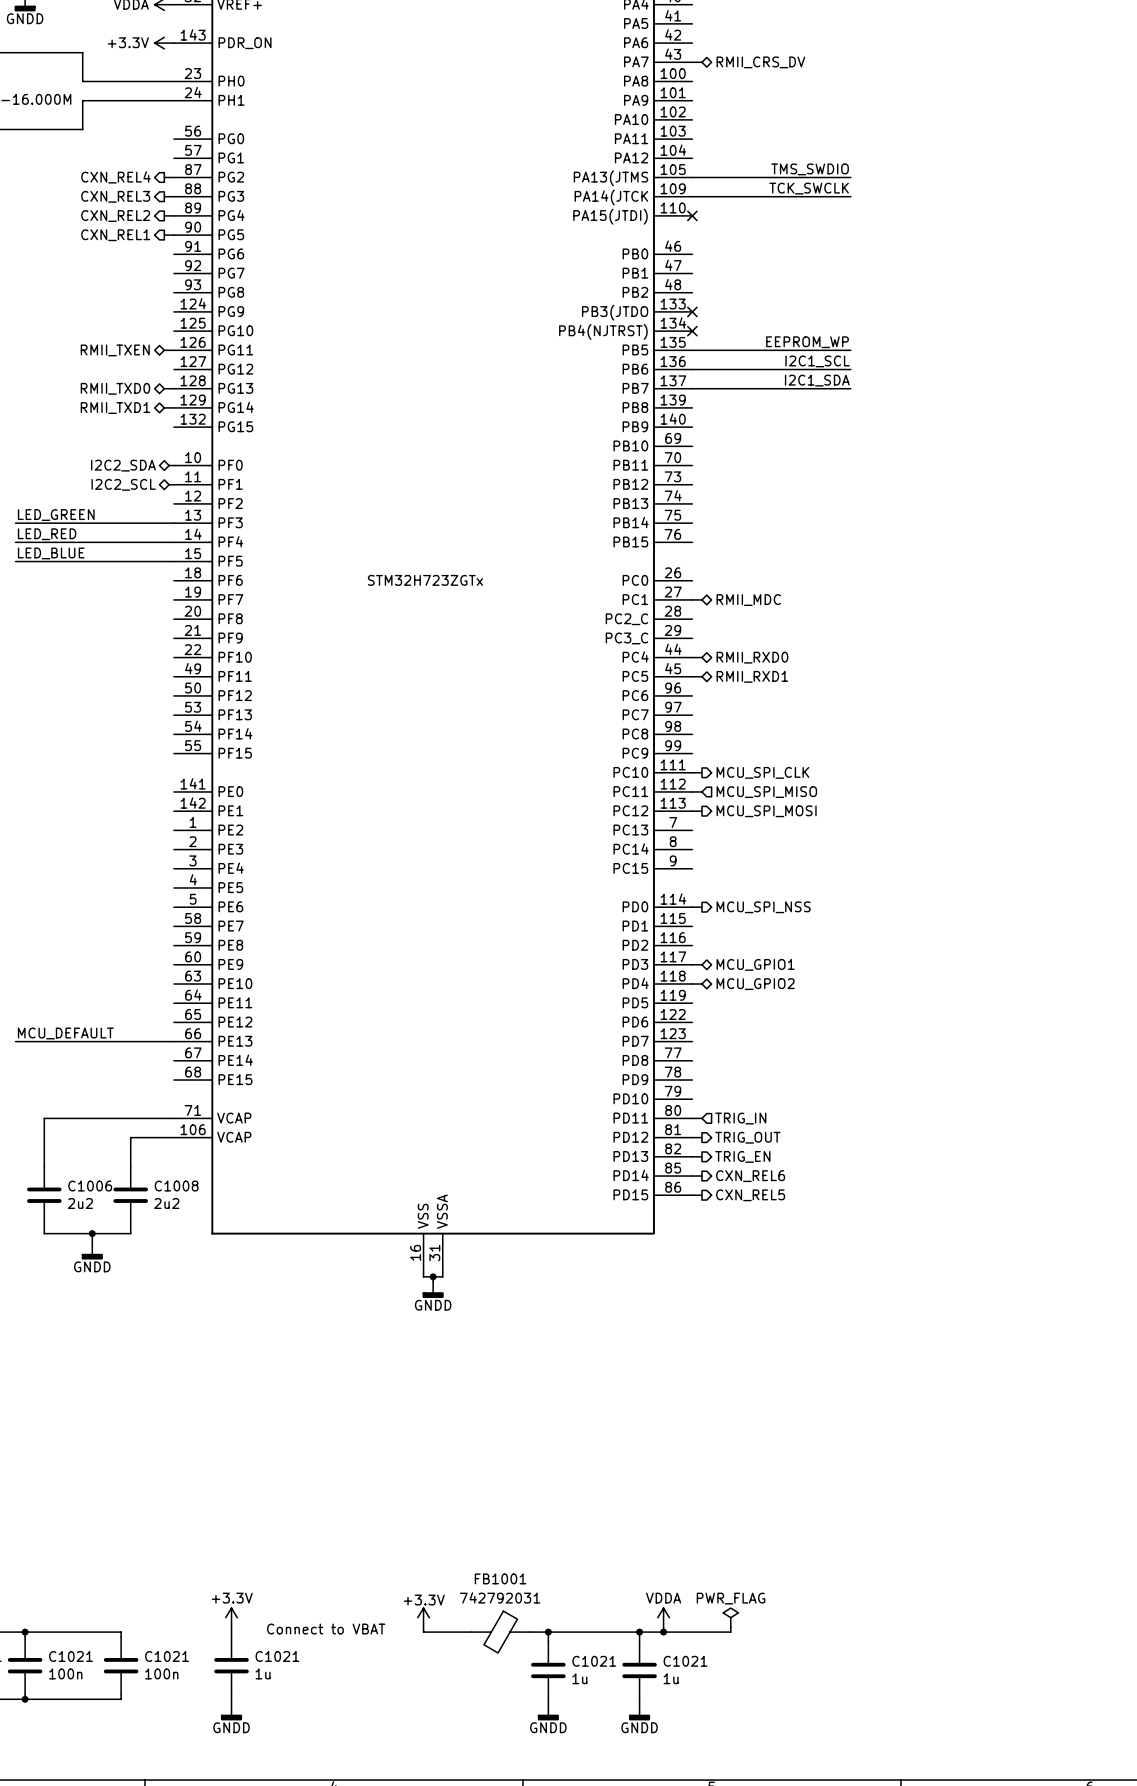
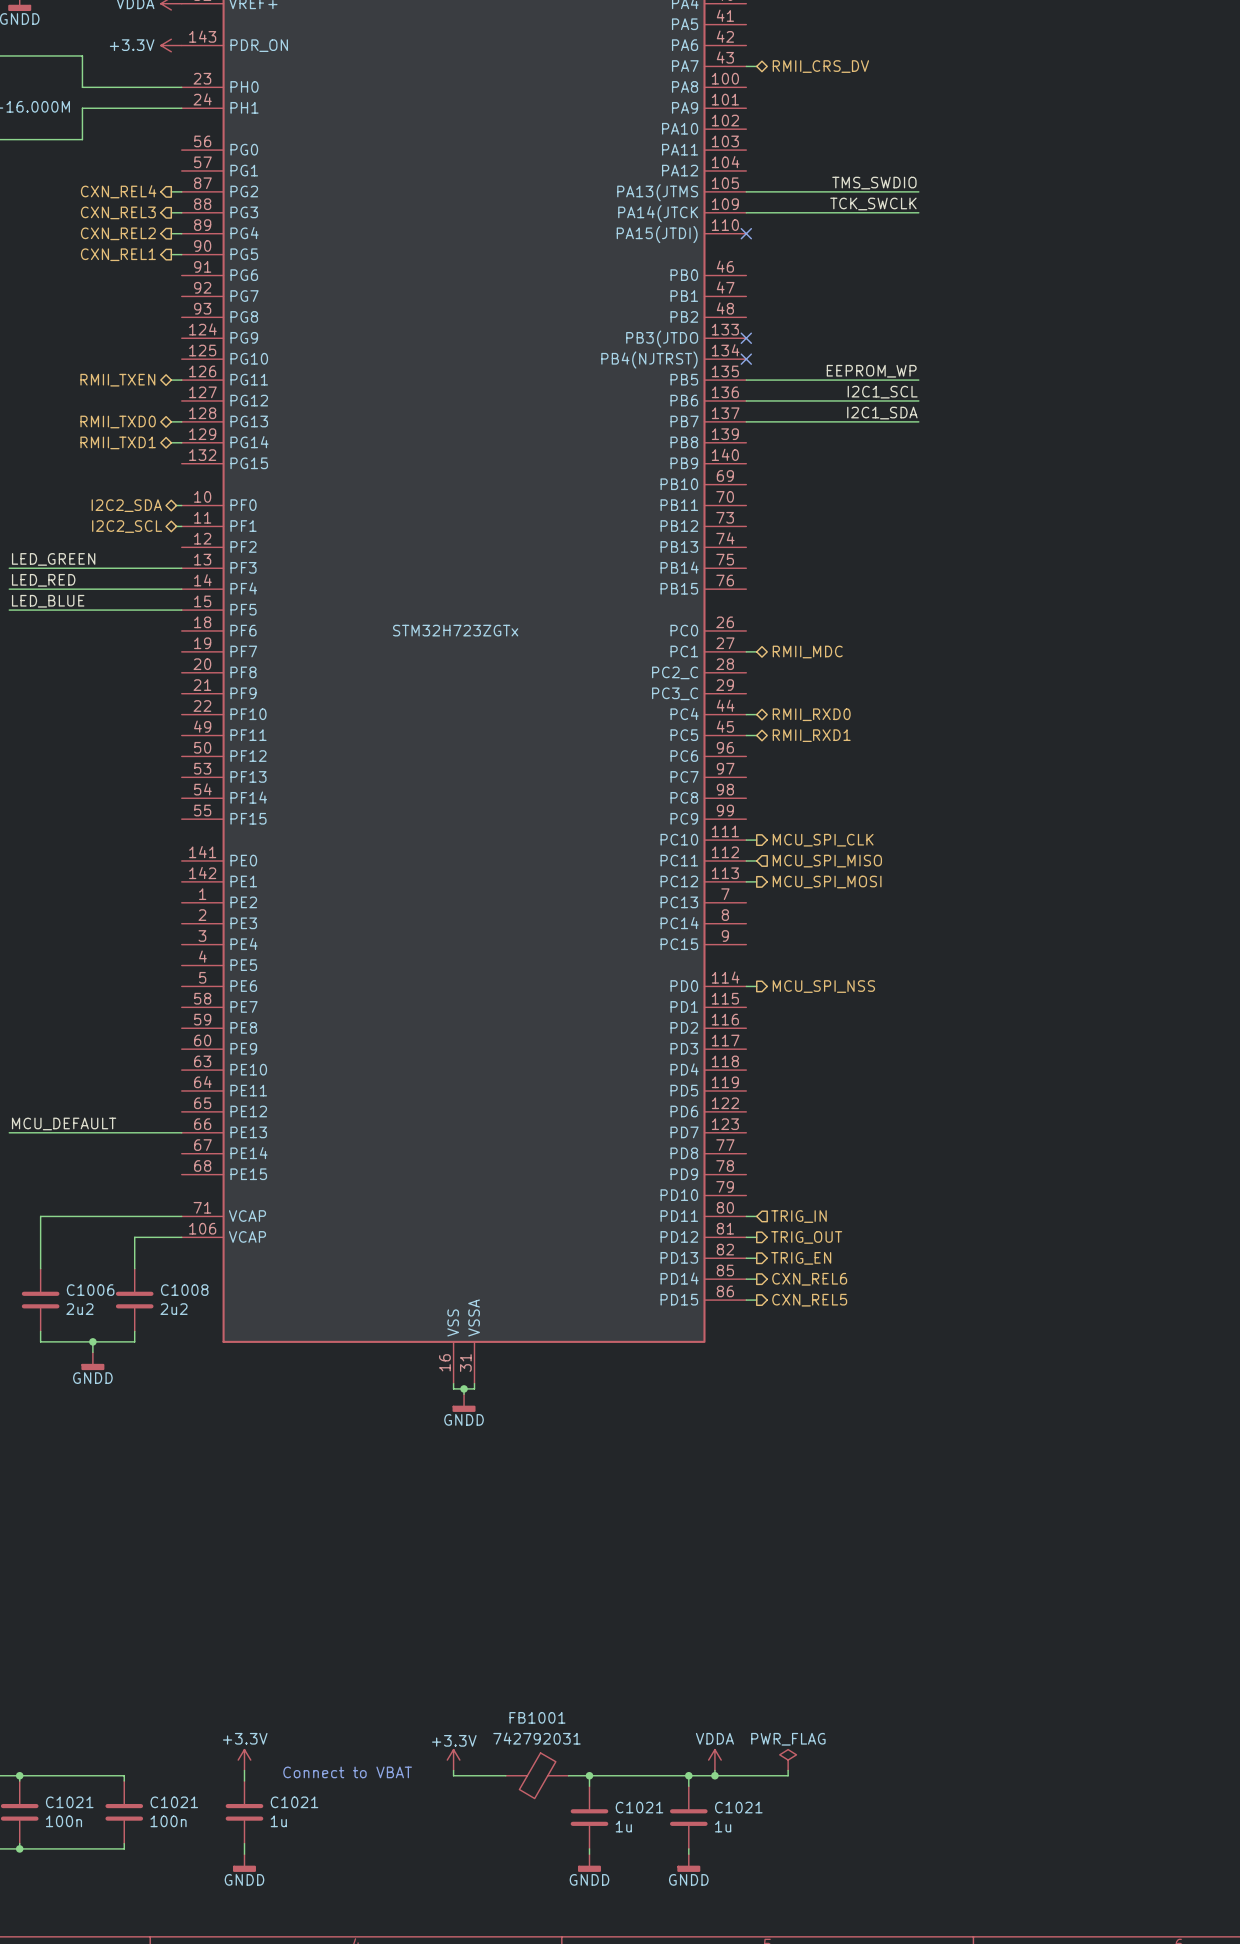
wire: (692, 964) (701, 964) -> none
hierarchical label: MCU_GPIO1 (755, 964) -> none
wire: (692, 984) (701, 984) -> none
hierarchical label: MCU_GPIO2 (755, 984) -> none

